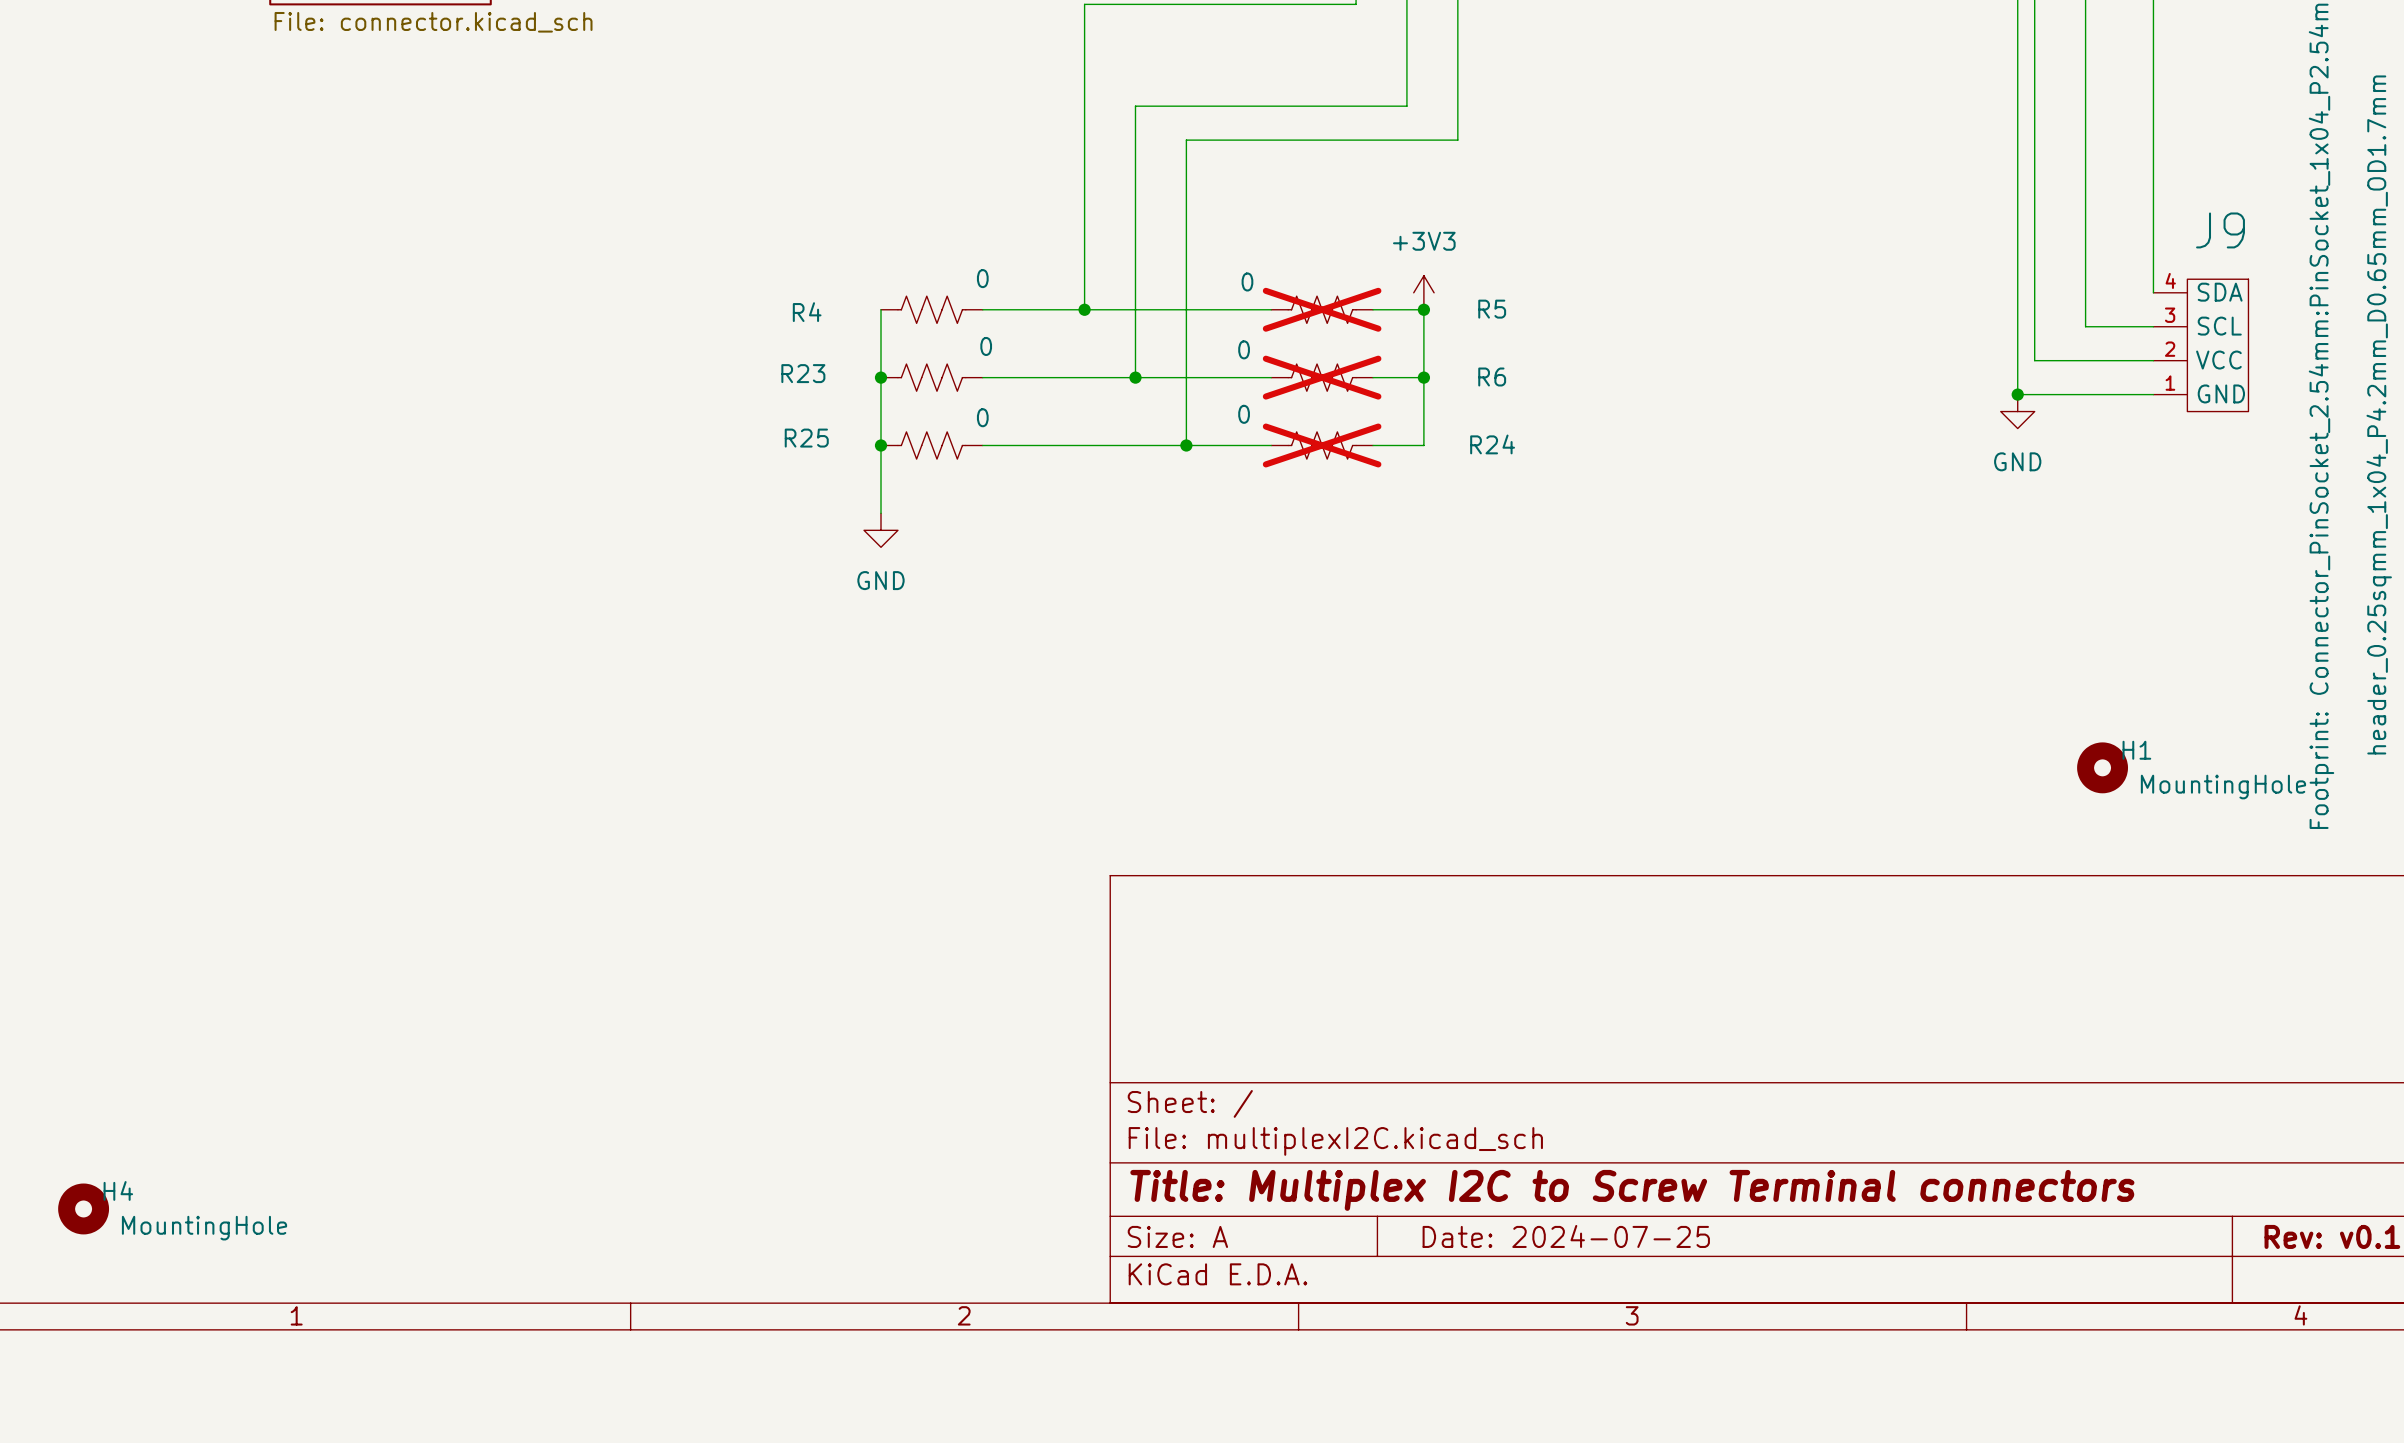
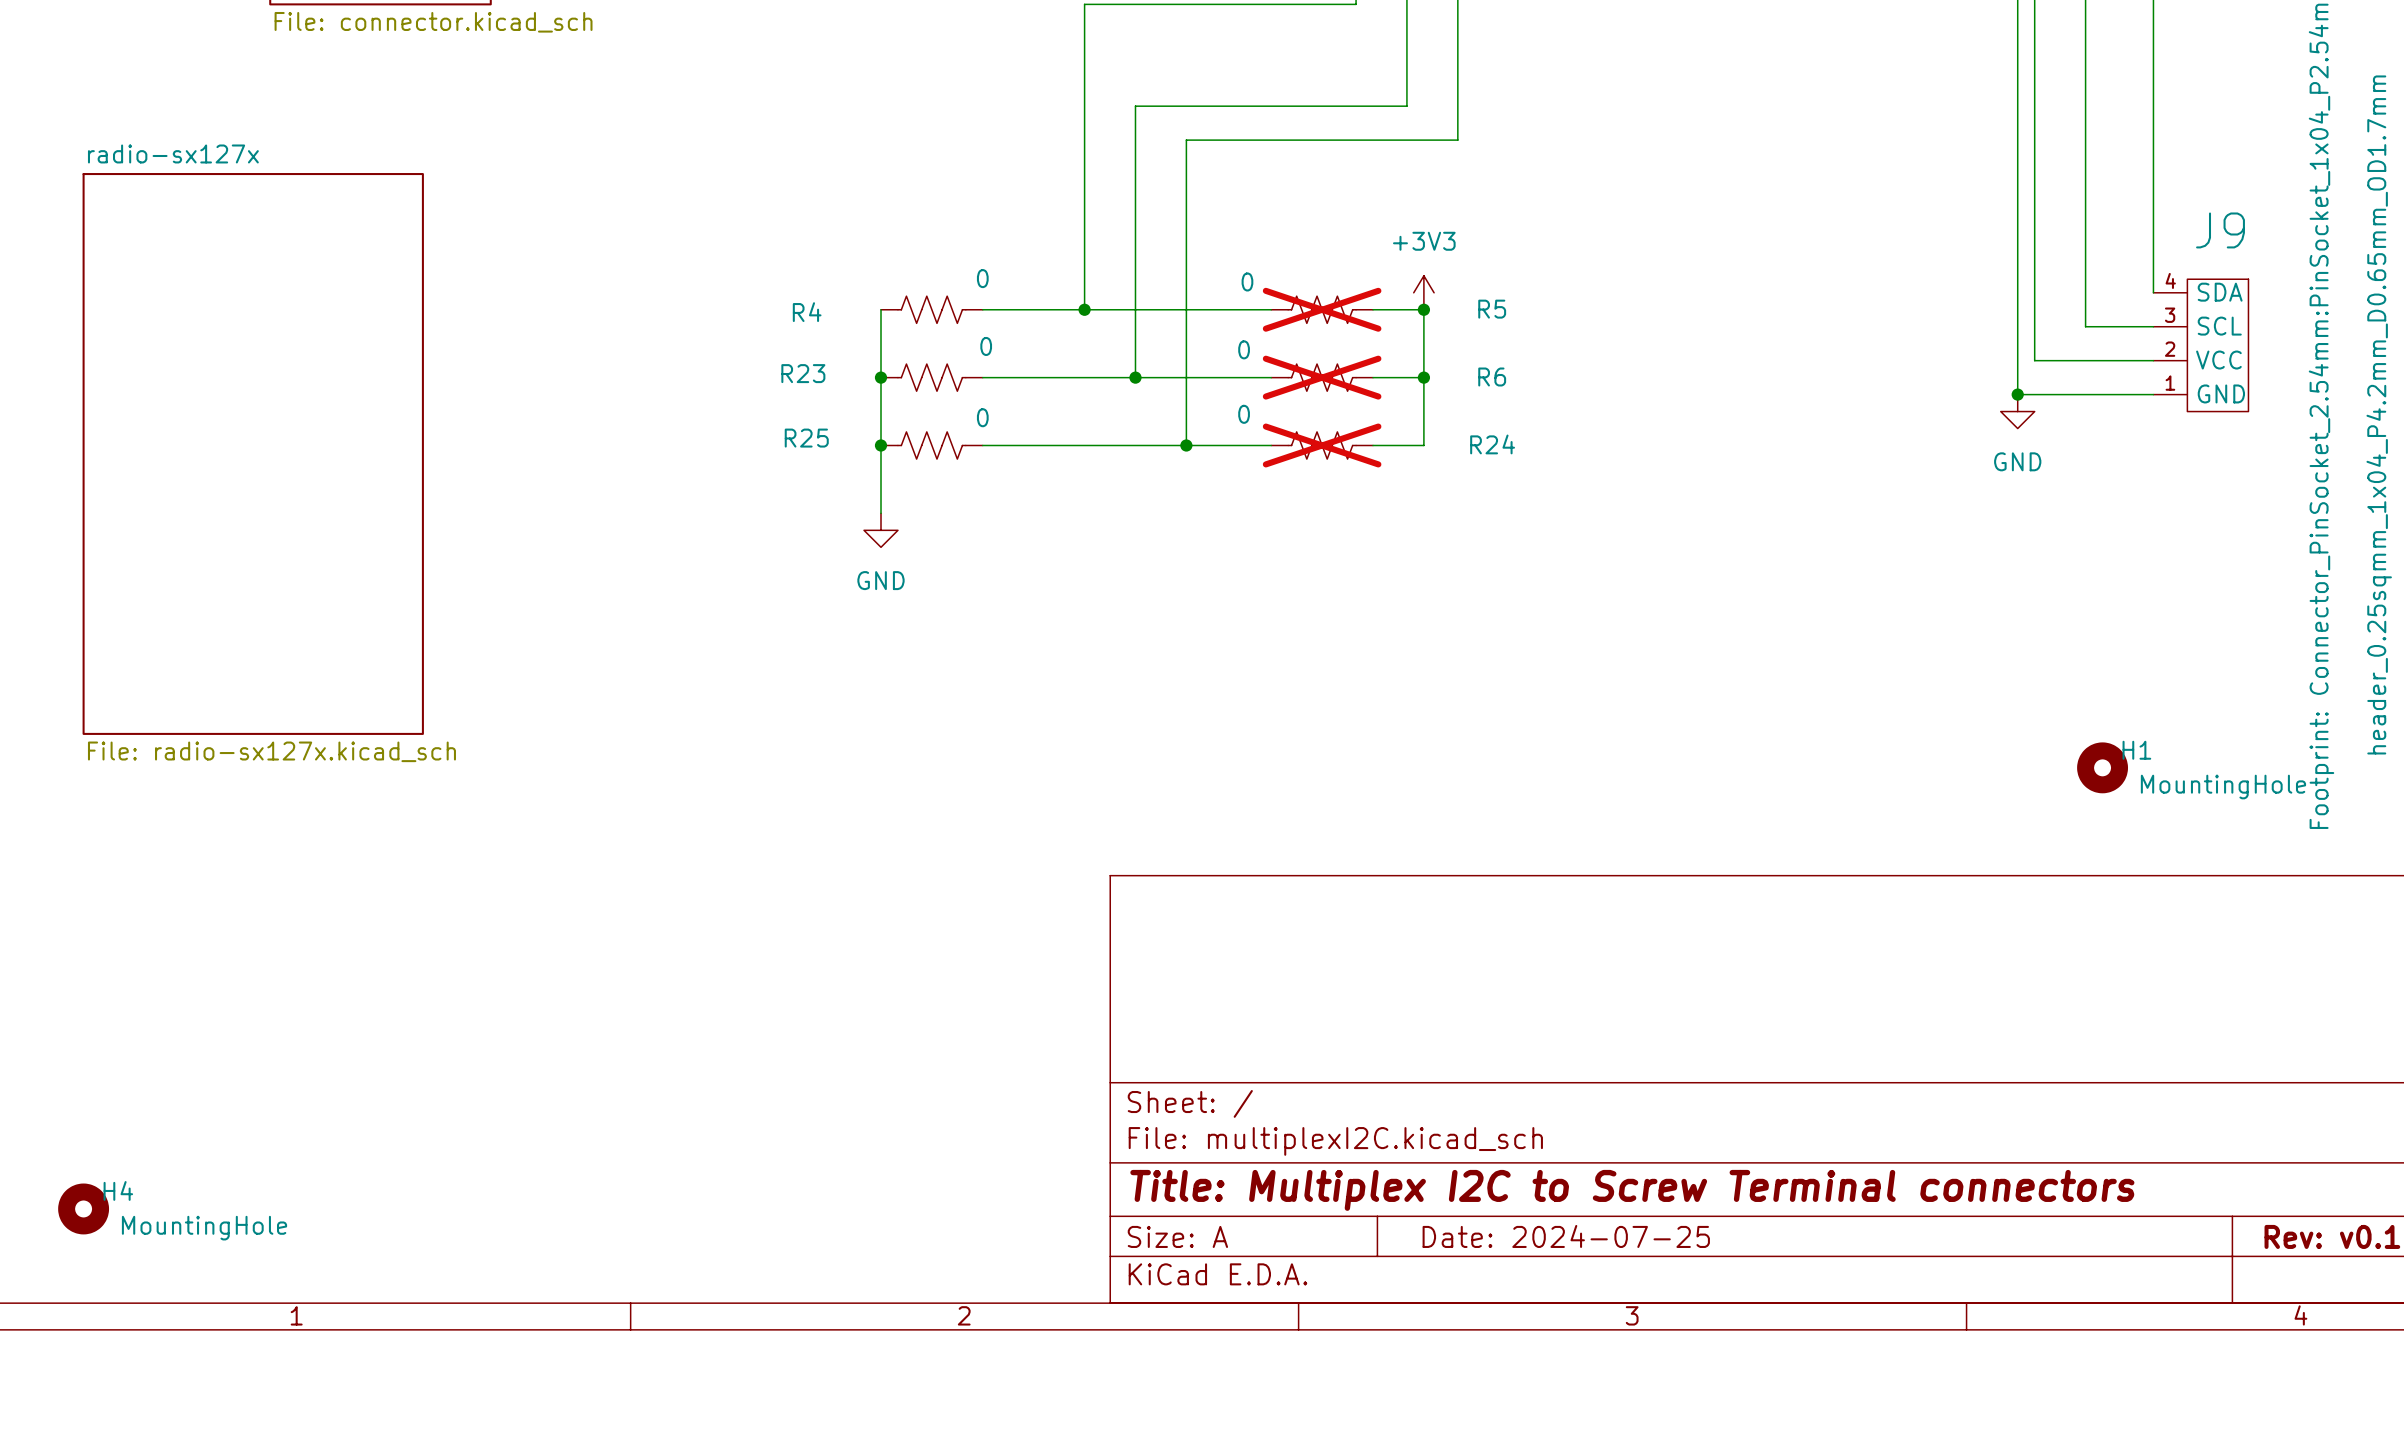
sheet radio-sx127x: none -> File: radio-sx127x.kicad_sch (253, 453)

